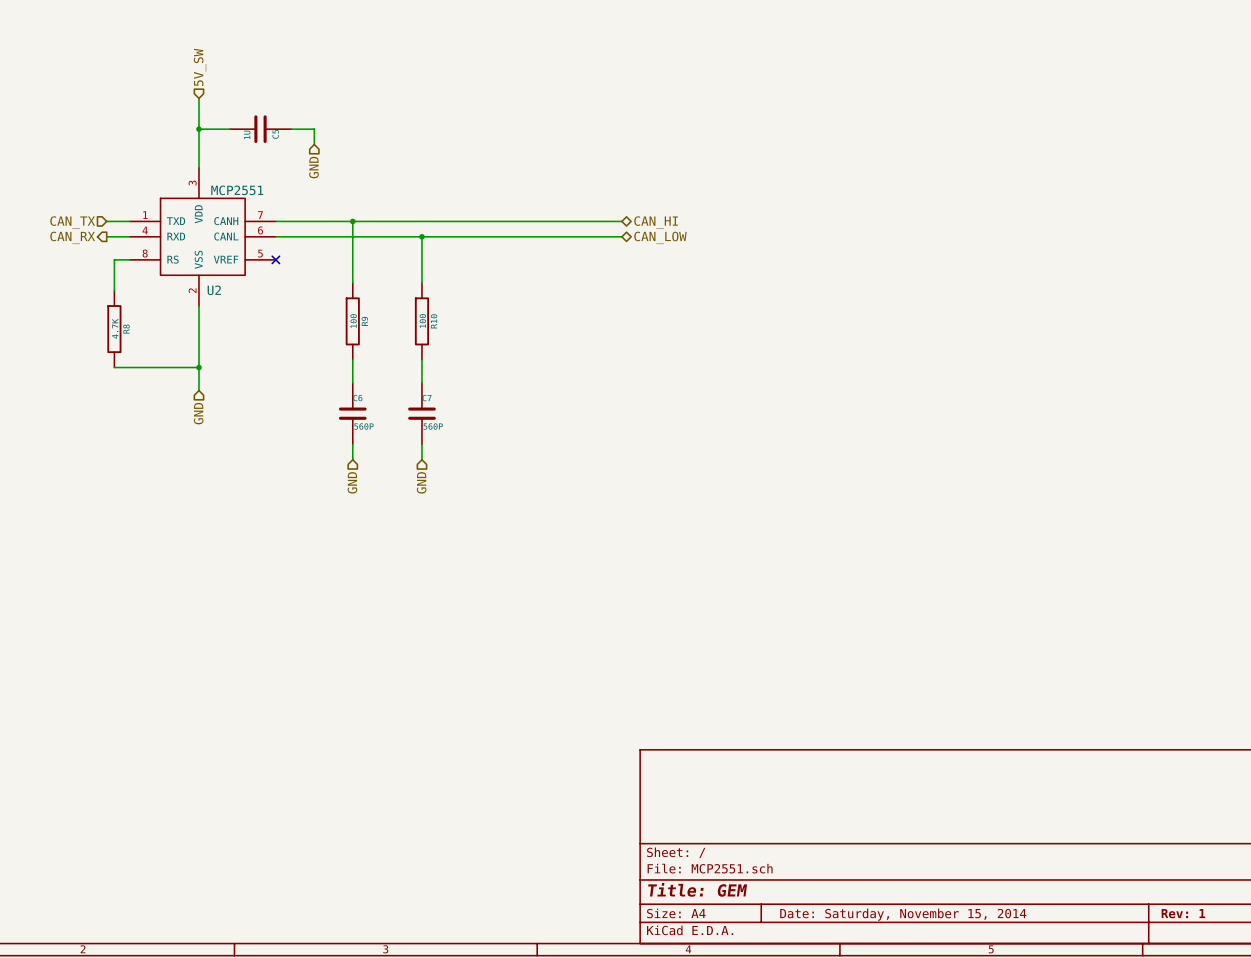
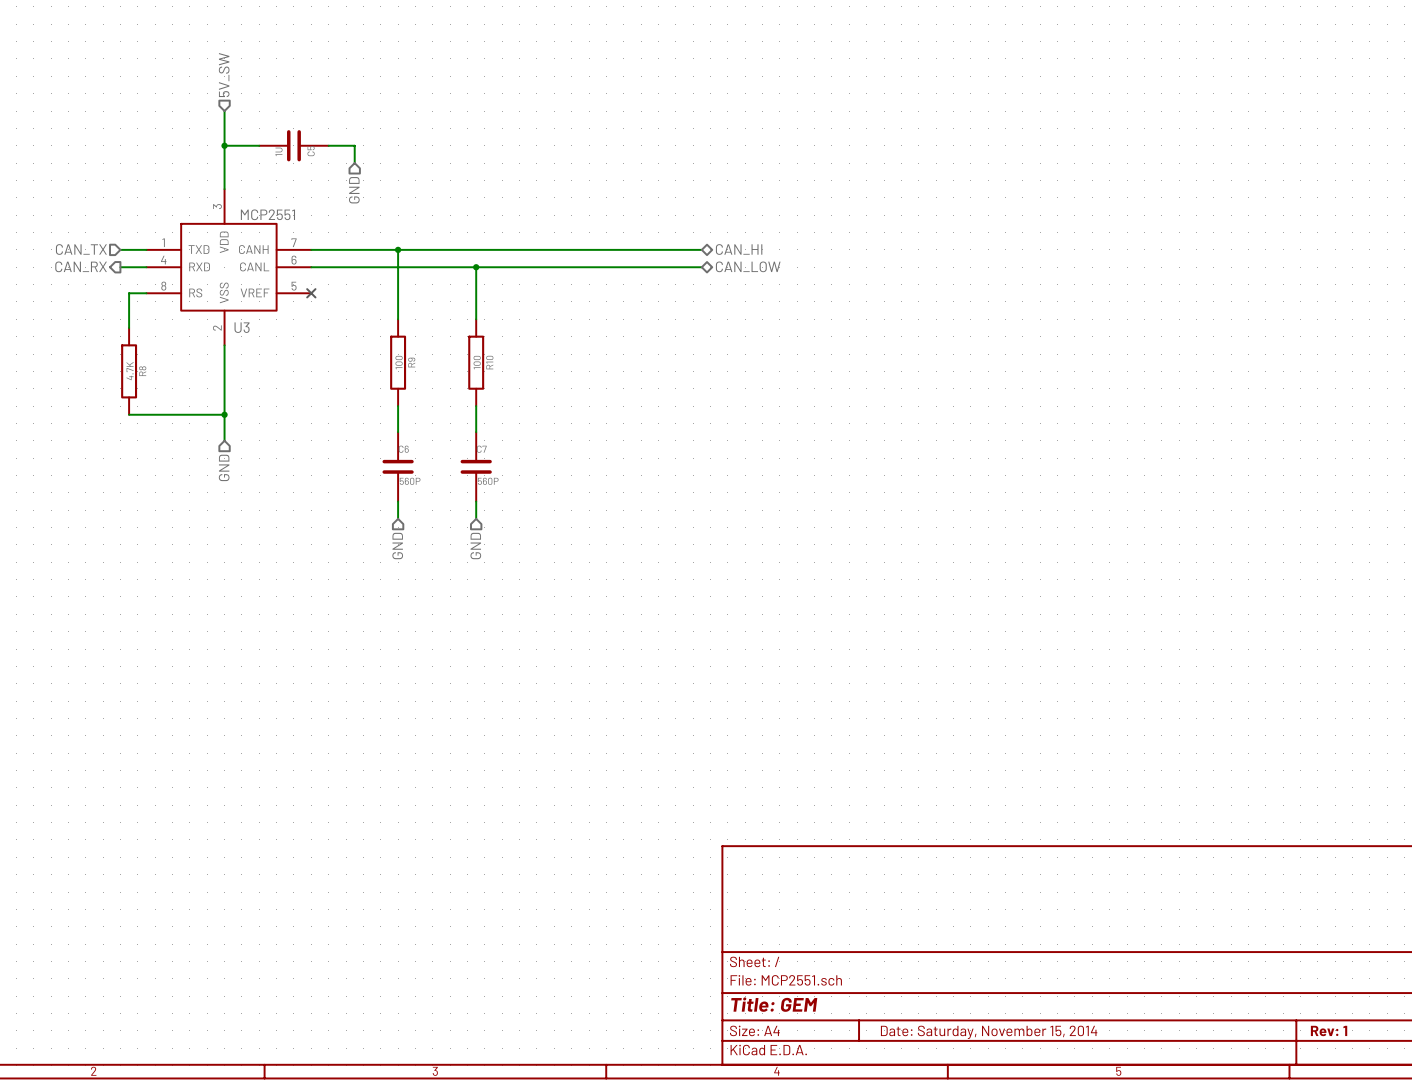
U2 name: U2 (214, 290) -> U3 (242, 327)

